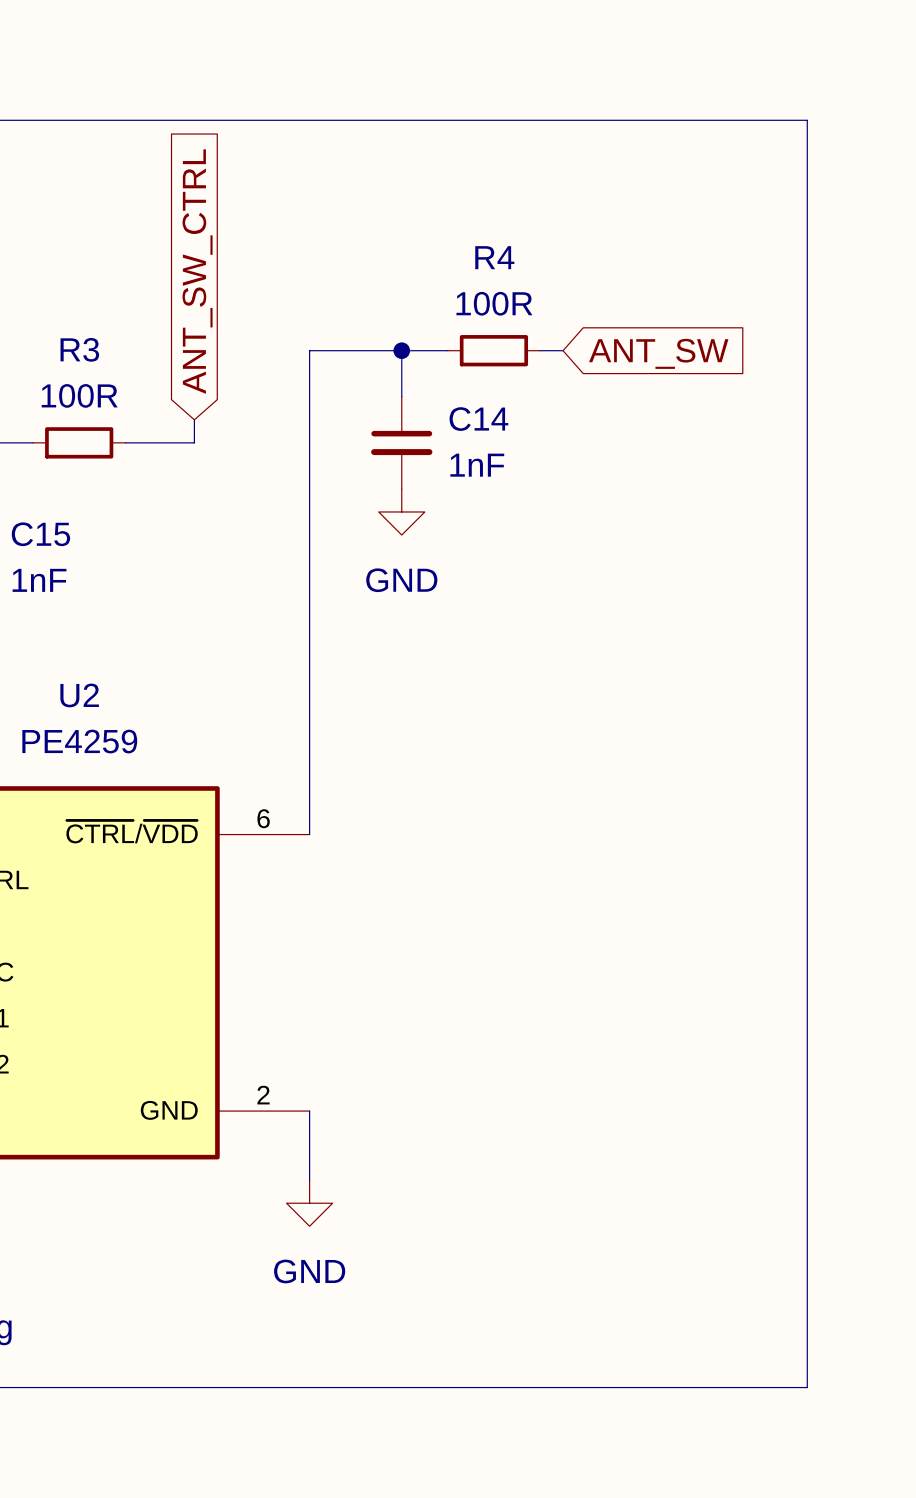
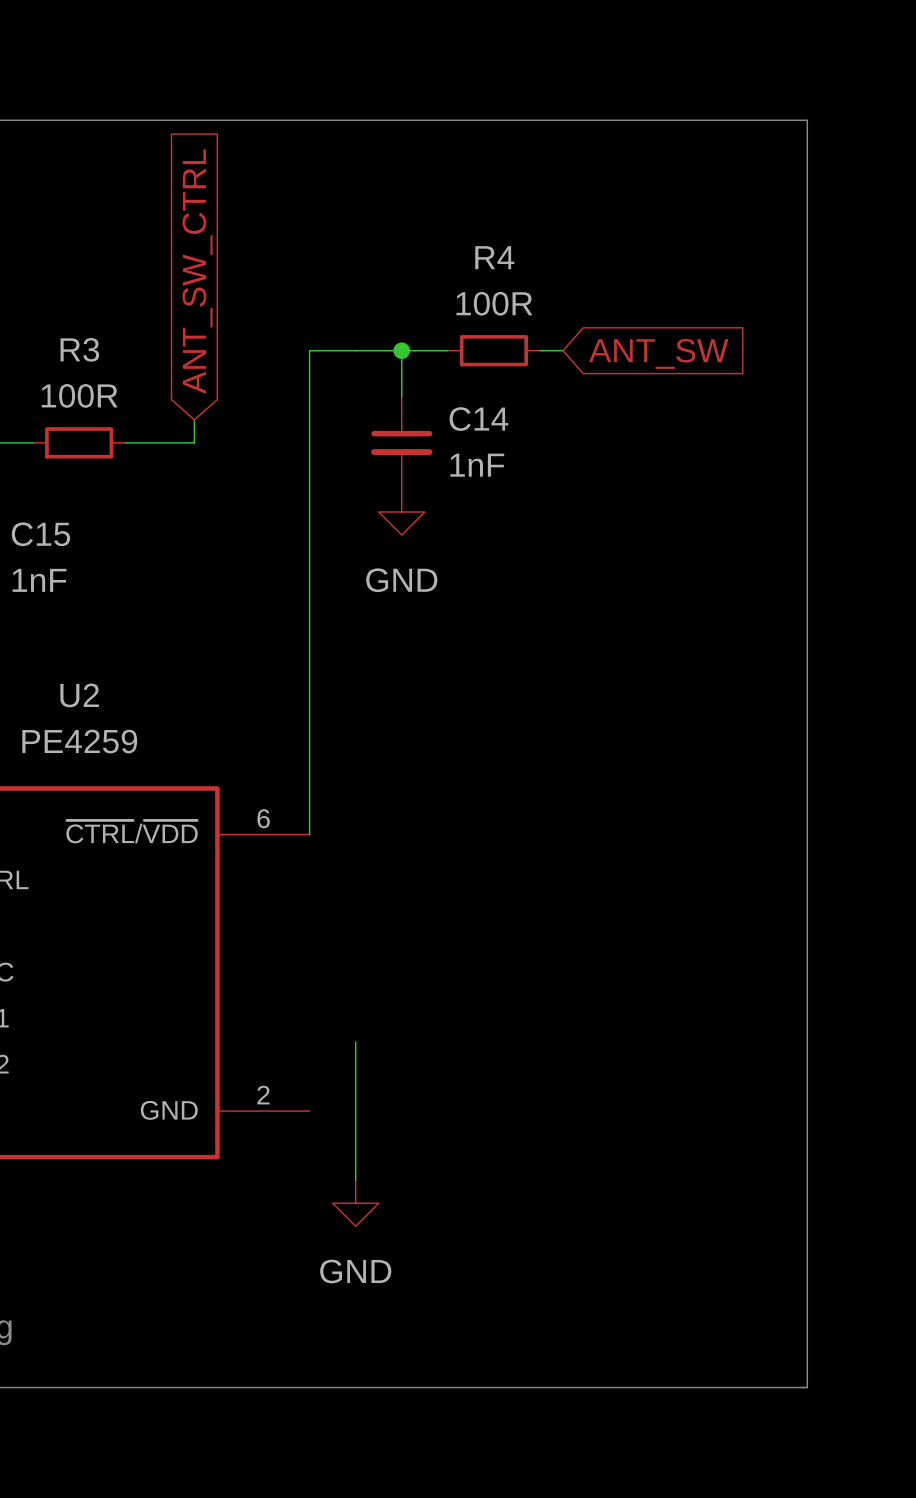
wire: none -> (355, 1041) (355, 1180)
wire: (309, 1111) (309, 1180) -> none
power symbol position: GND (309, 1203) -> GND (355, 1203)

